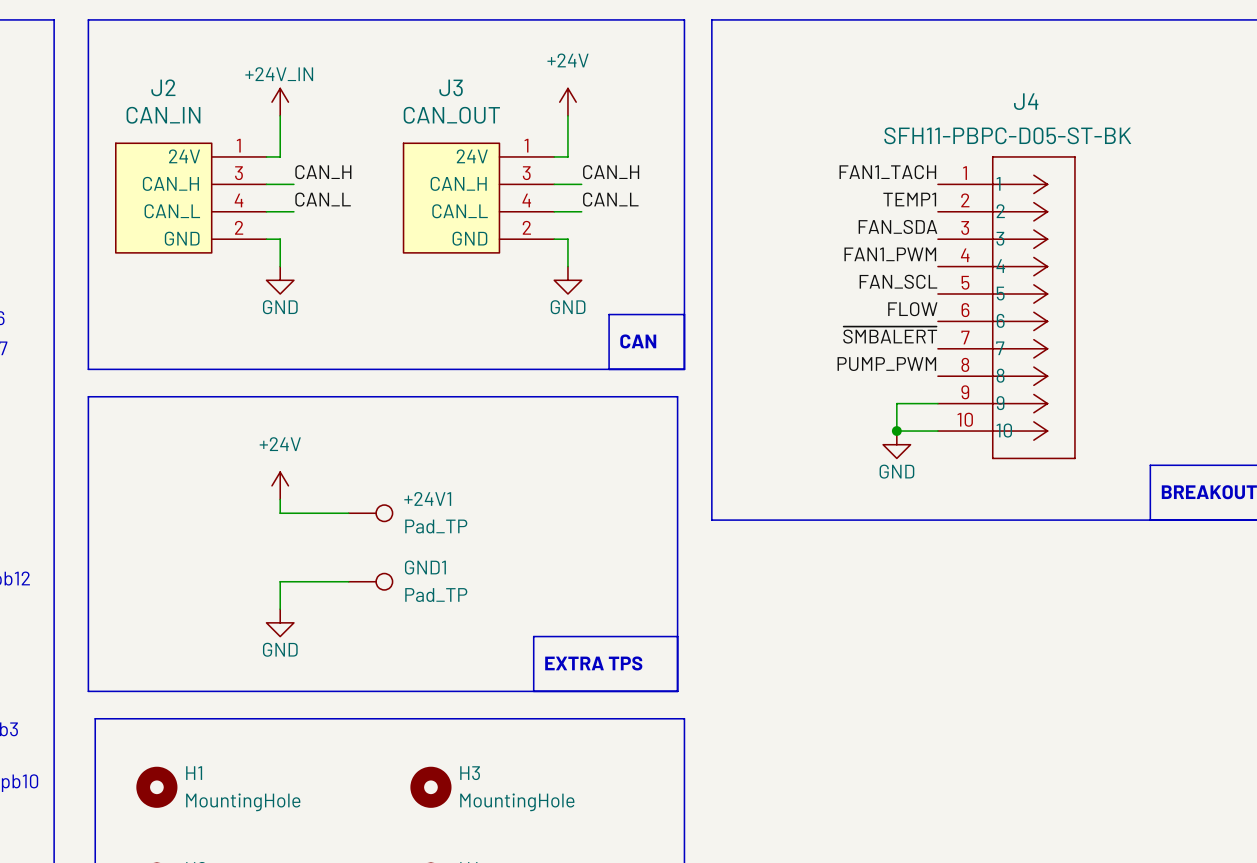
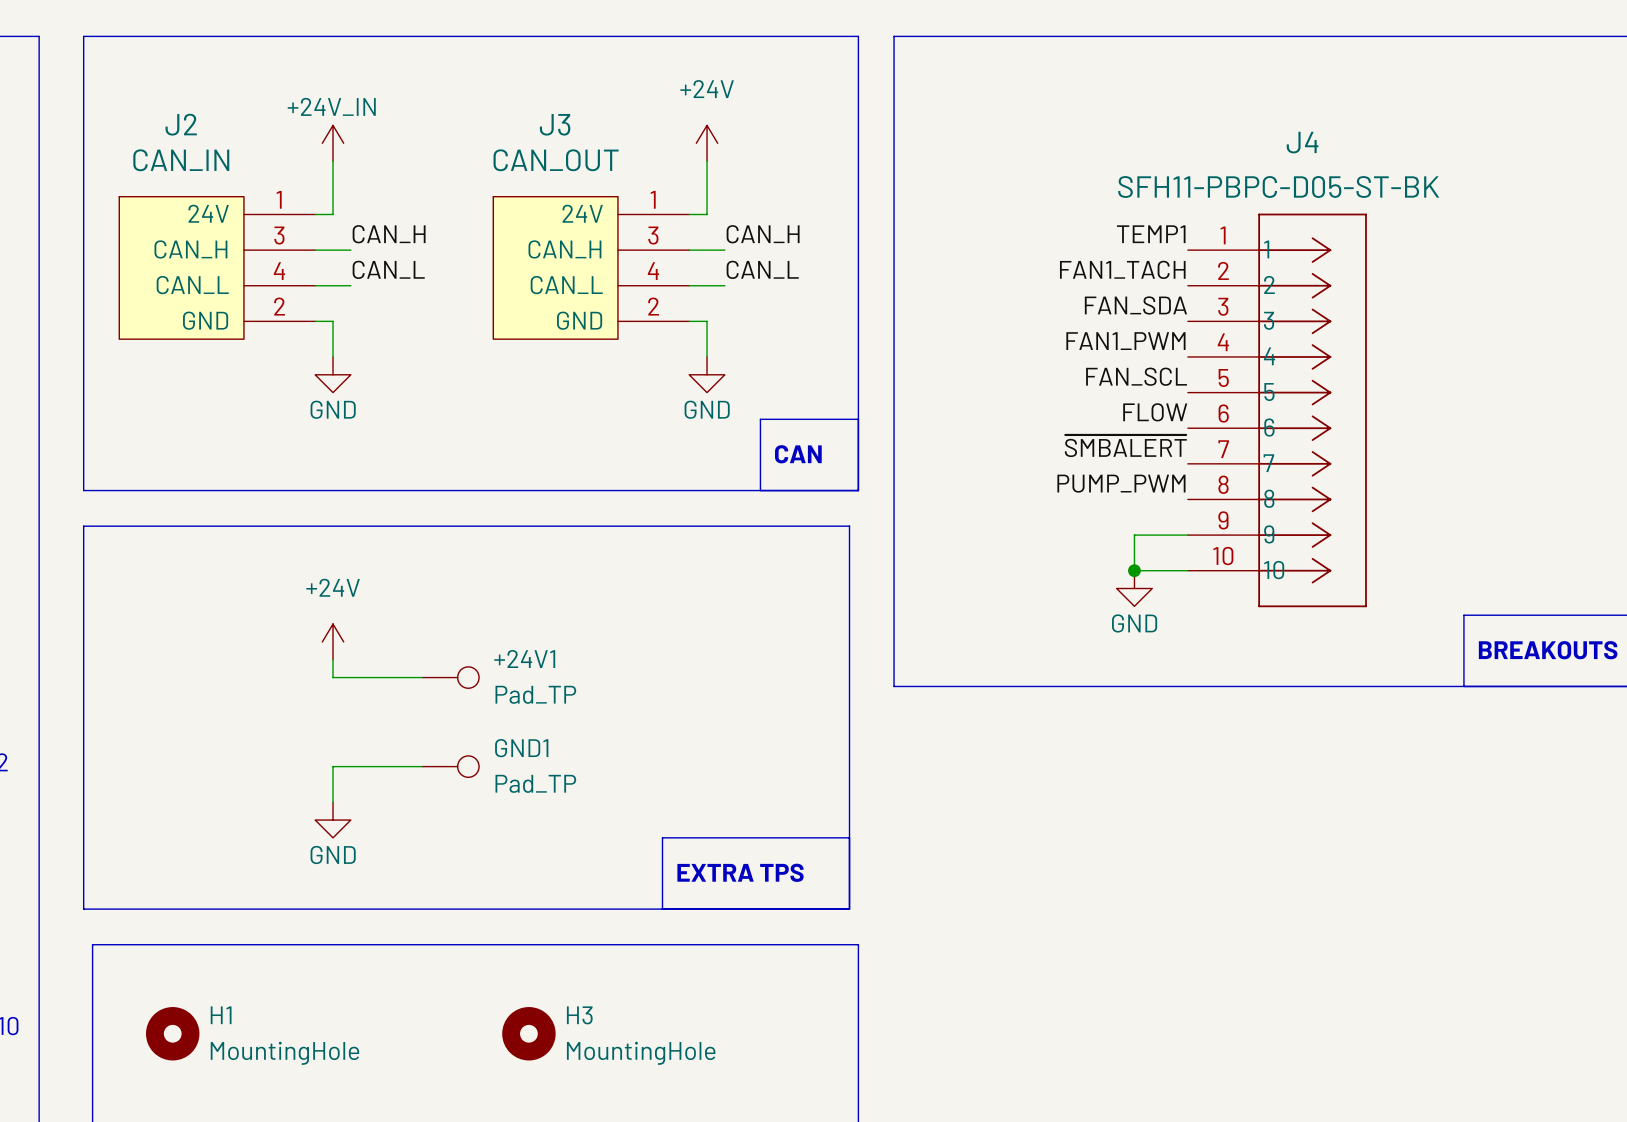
label: FAN1_TACH (887, 172) -> TEMP1 (1151, 234)
label: TEMP1 (909, 199) -> FAN1_TACH (1122, 269)

